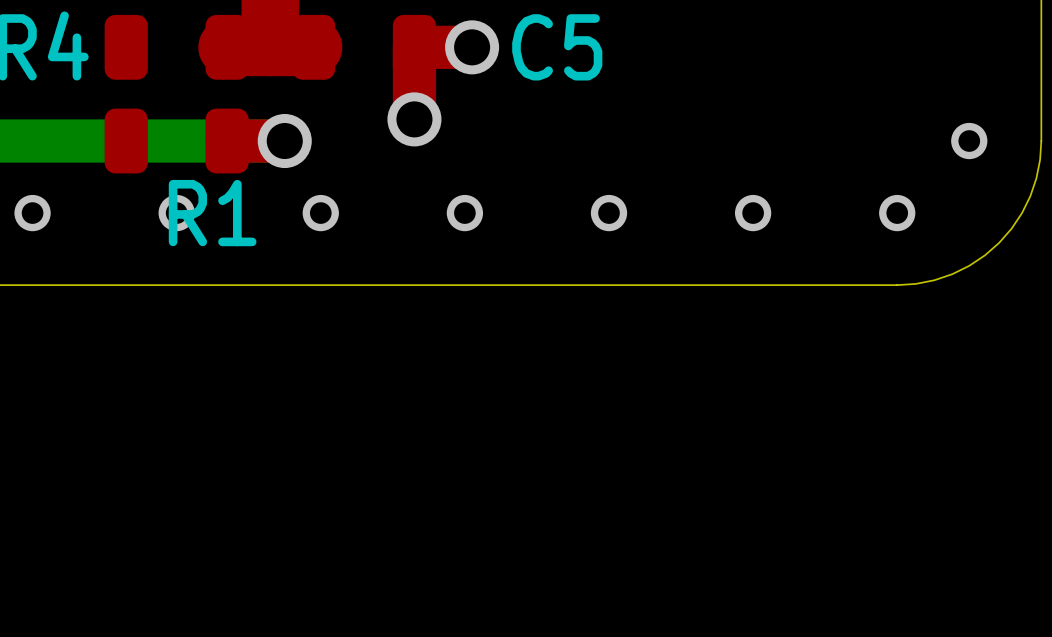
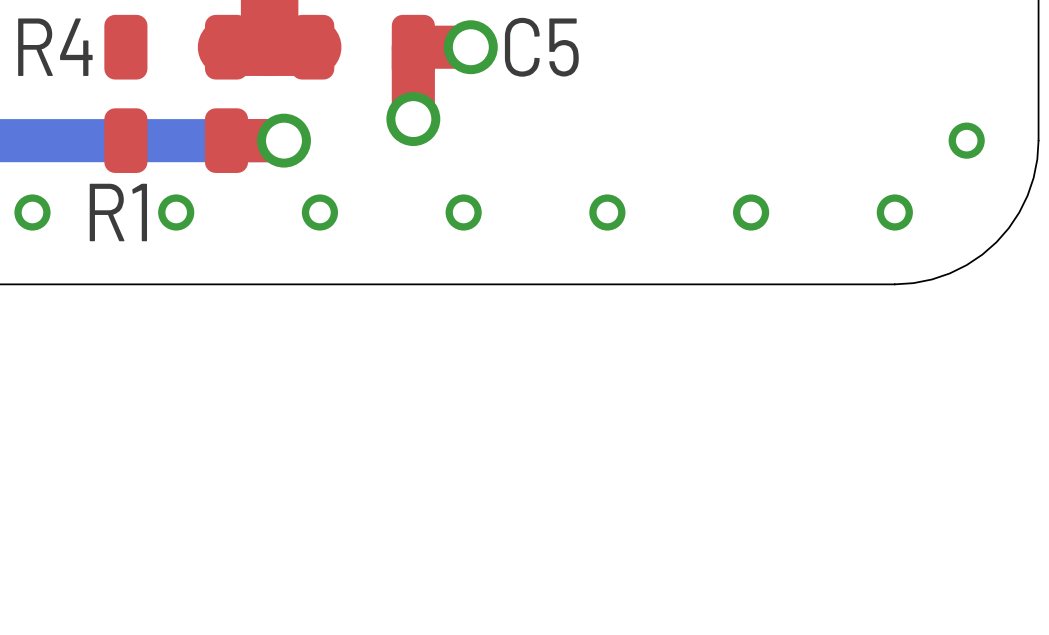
R1 name position: R1 (212, 213) -> R1 (118, 212)

